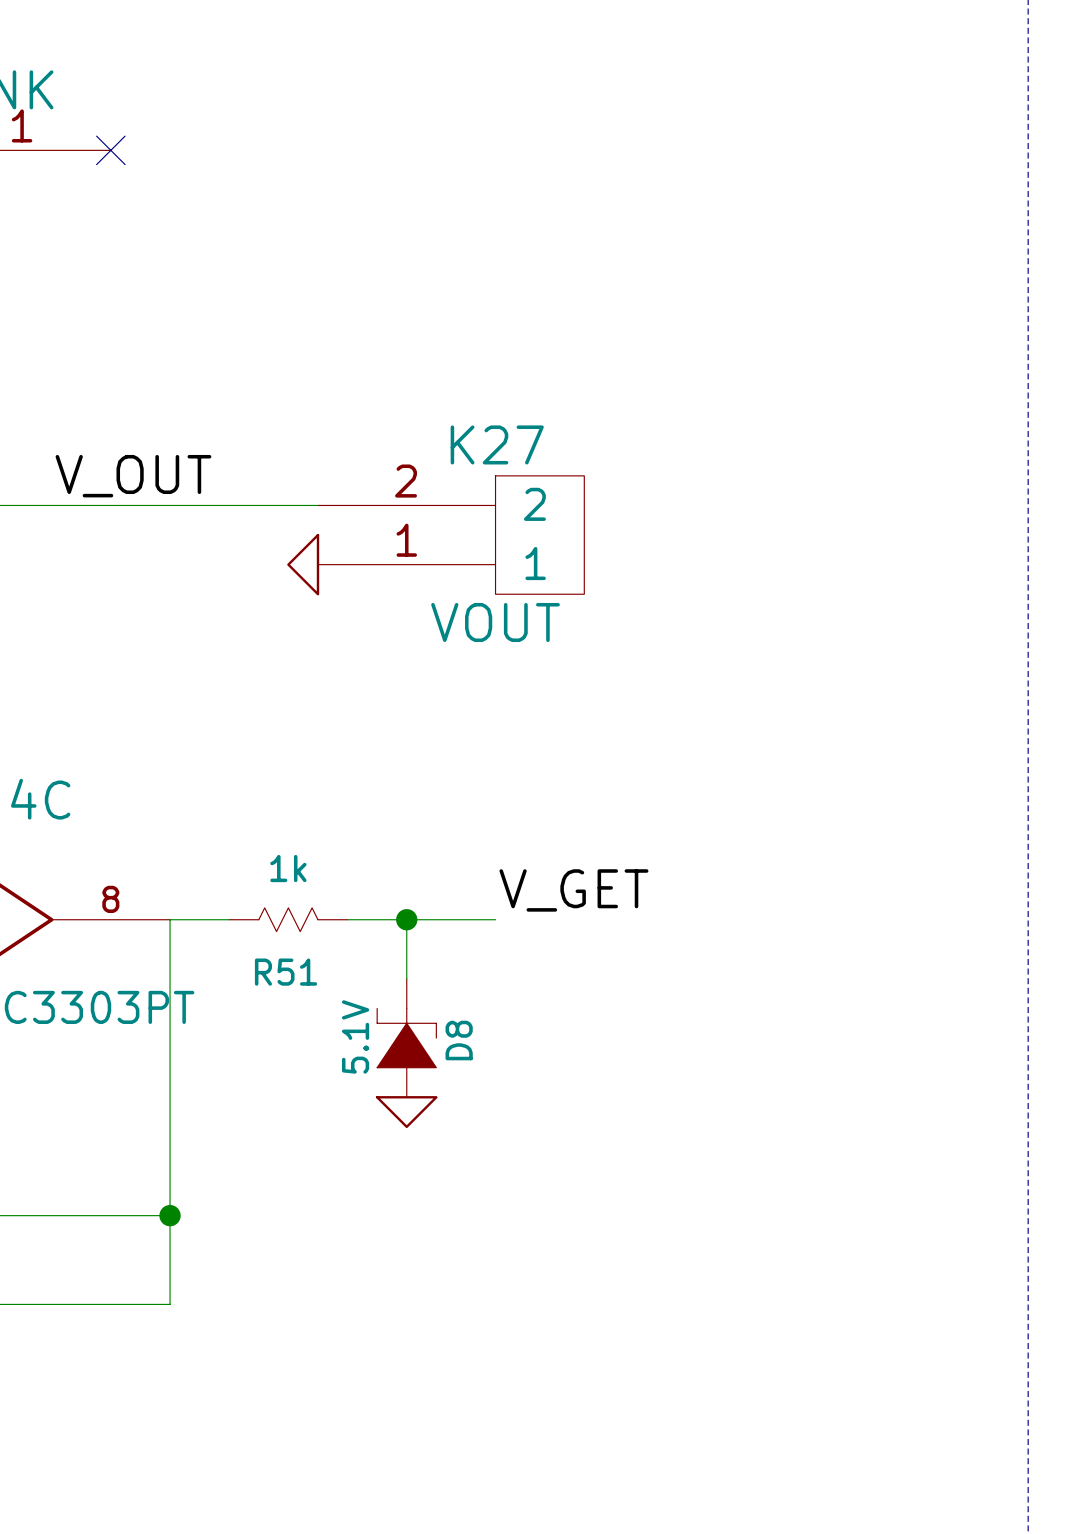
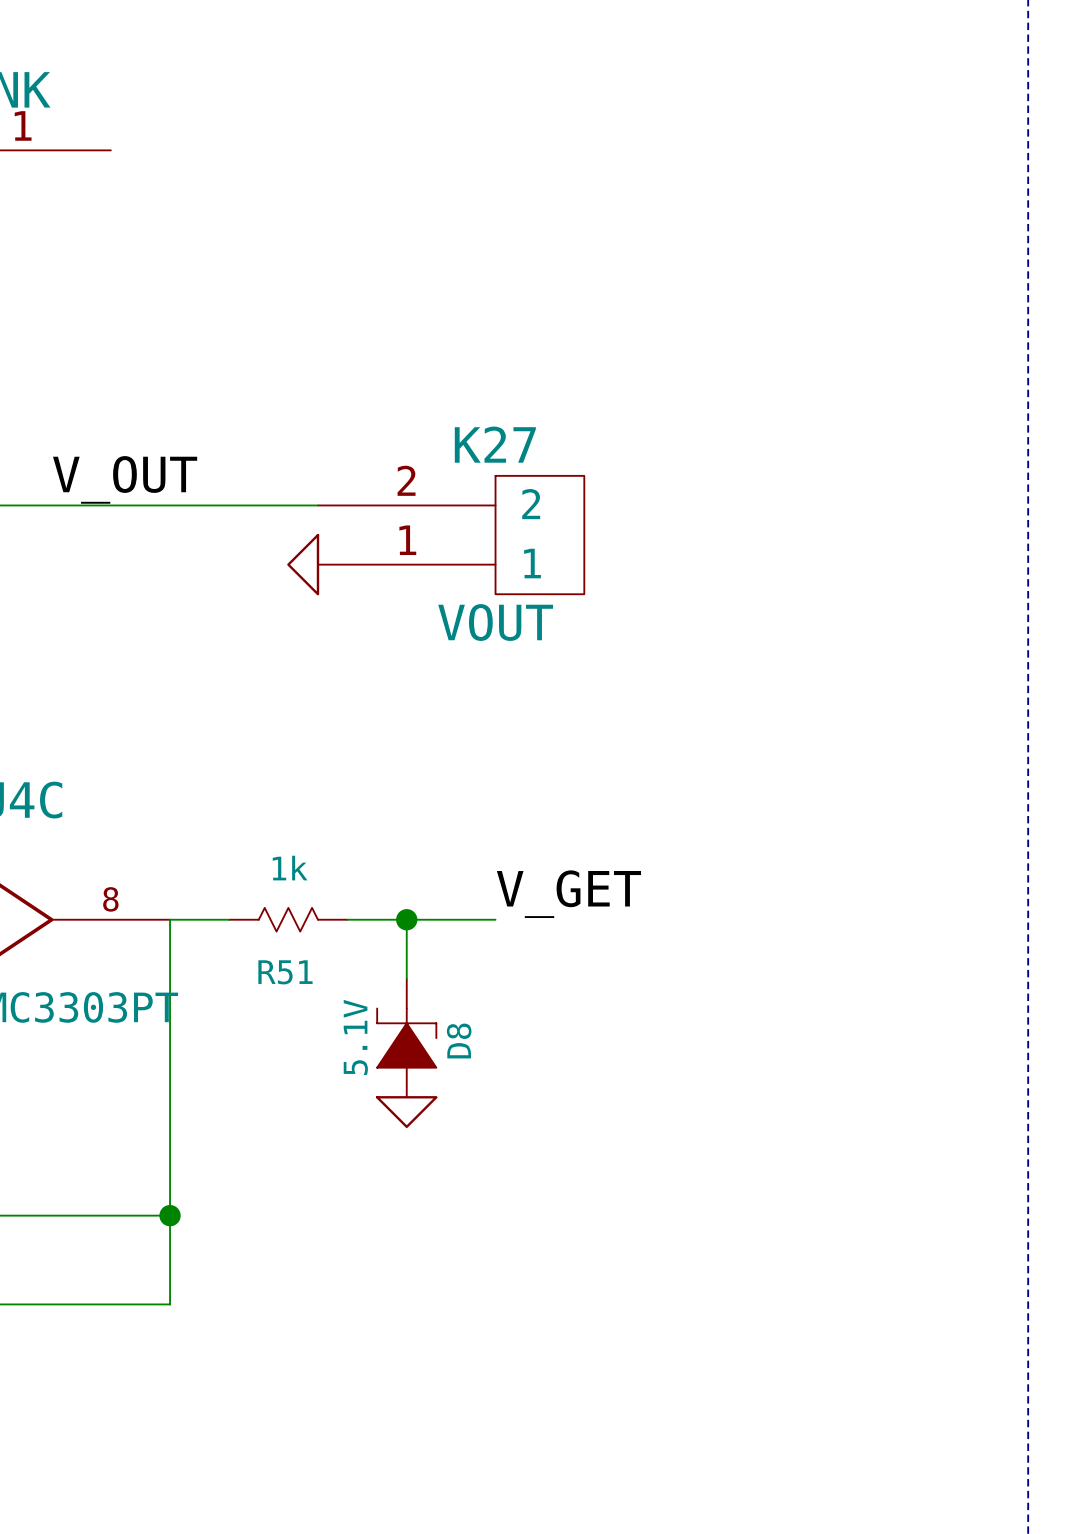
no-connect mark: (110, 150) -> none

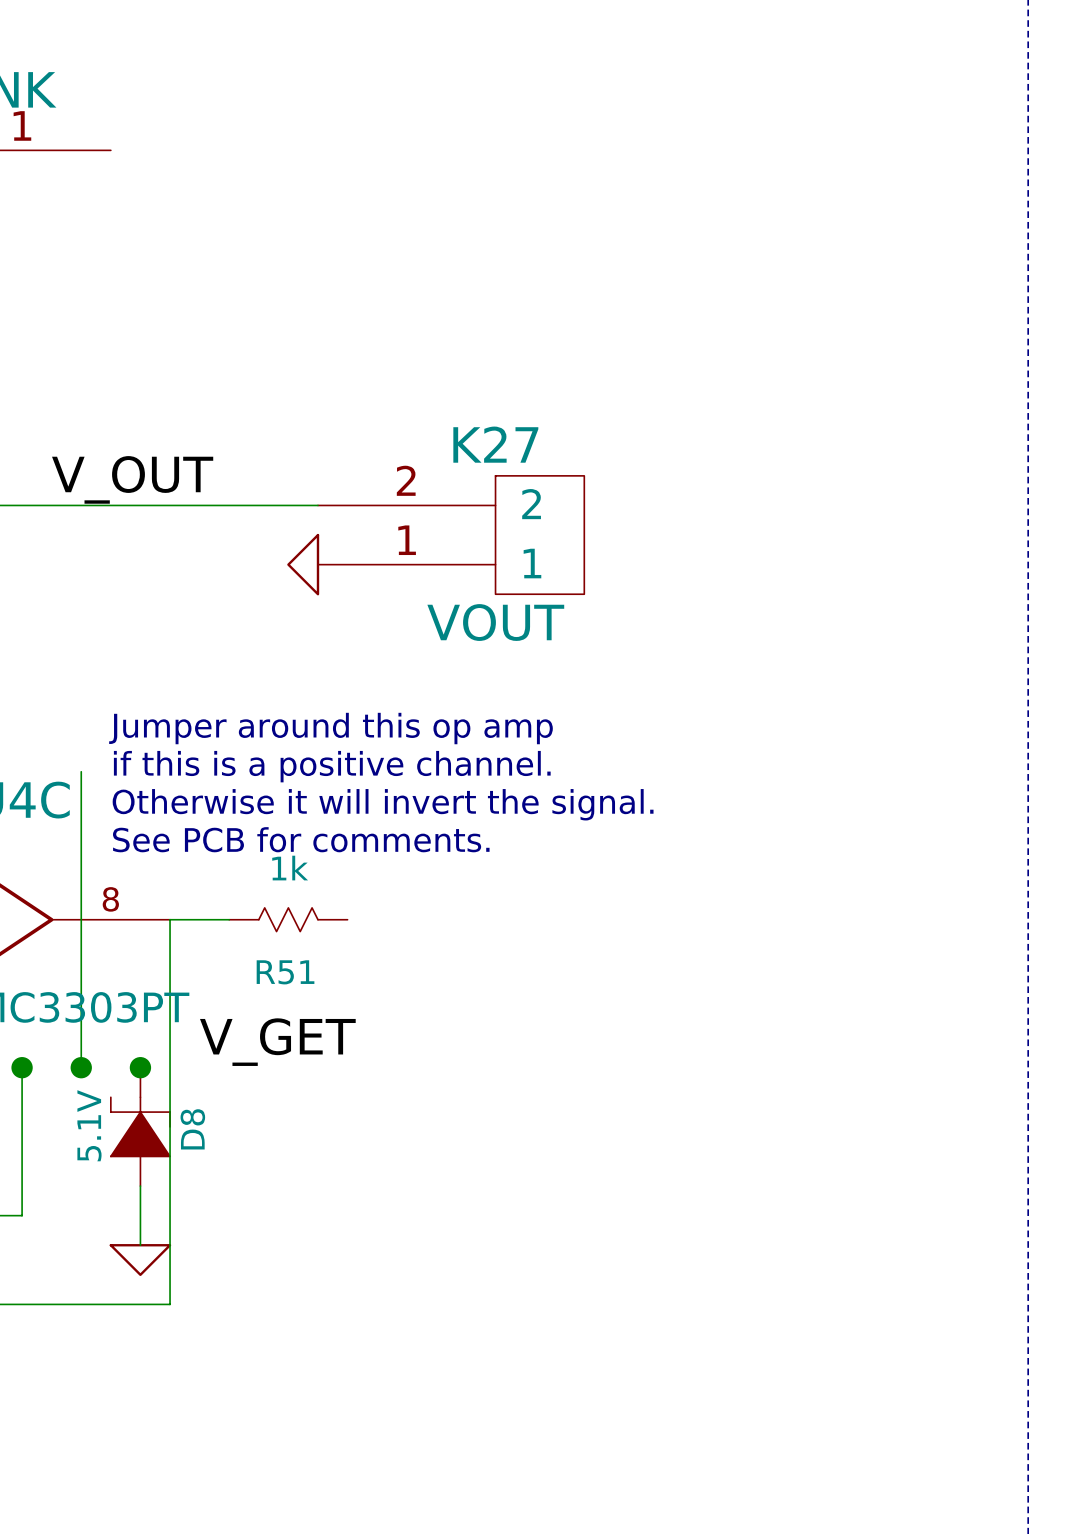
text: none -> Jumper around this op amp (331, 728)
text: none -> if this is a positive channel. (332, 766)
wire: none -> (81, 771) (81, 1067)
text: none -> Otherwise it will invert the signal. (383, 804)
text: none -> See PCB for comments. (301, 839)
label position: V_GET (568, 894) -> V_GET (277, 1042)
wire: (347, 919) (495, 919) -> none
wire: (406, 919) (406, 978) -> (140, 1186) (140, 1245)
junction: (406, 919) -> none
D8 position: (406, 1038) -> (140, 1126)
junction: none -> (22, 1067)
junction: none -> (81, 1067)
junction: none -> (140, 1067)
power symbol position: (406, 1112) -> (140, 1260)
wire: (22, 1215) (170, 1215) -> (22, 1215) (22, 1067)
junction: (170, 1215) -> none

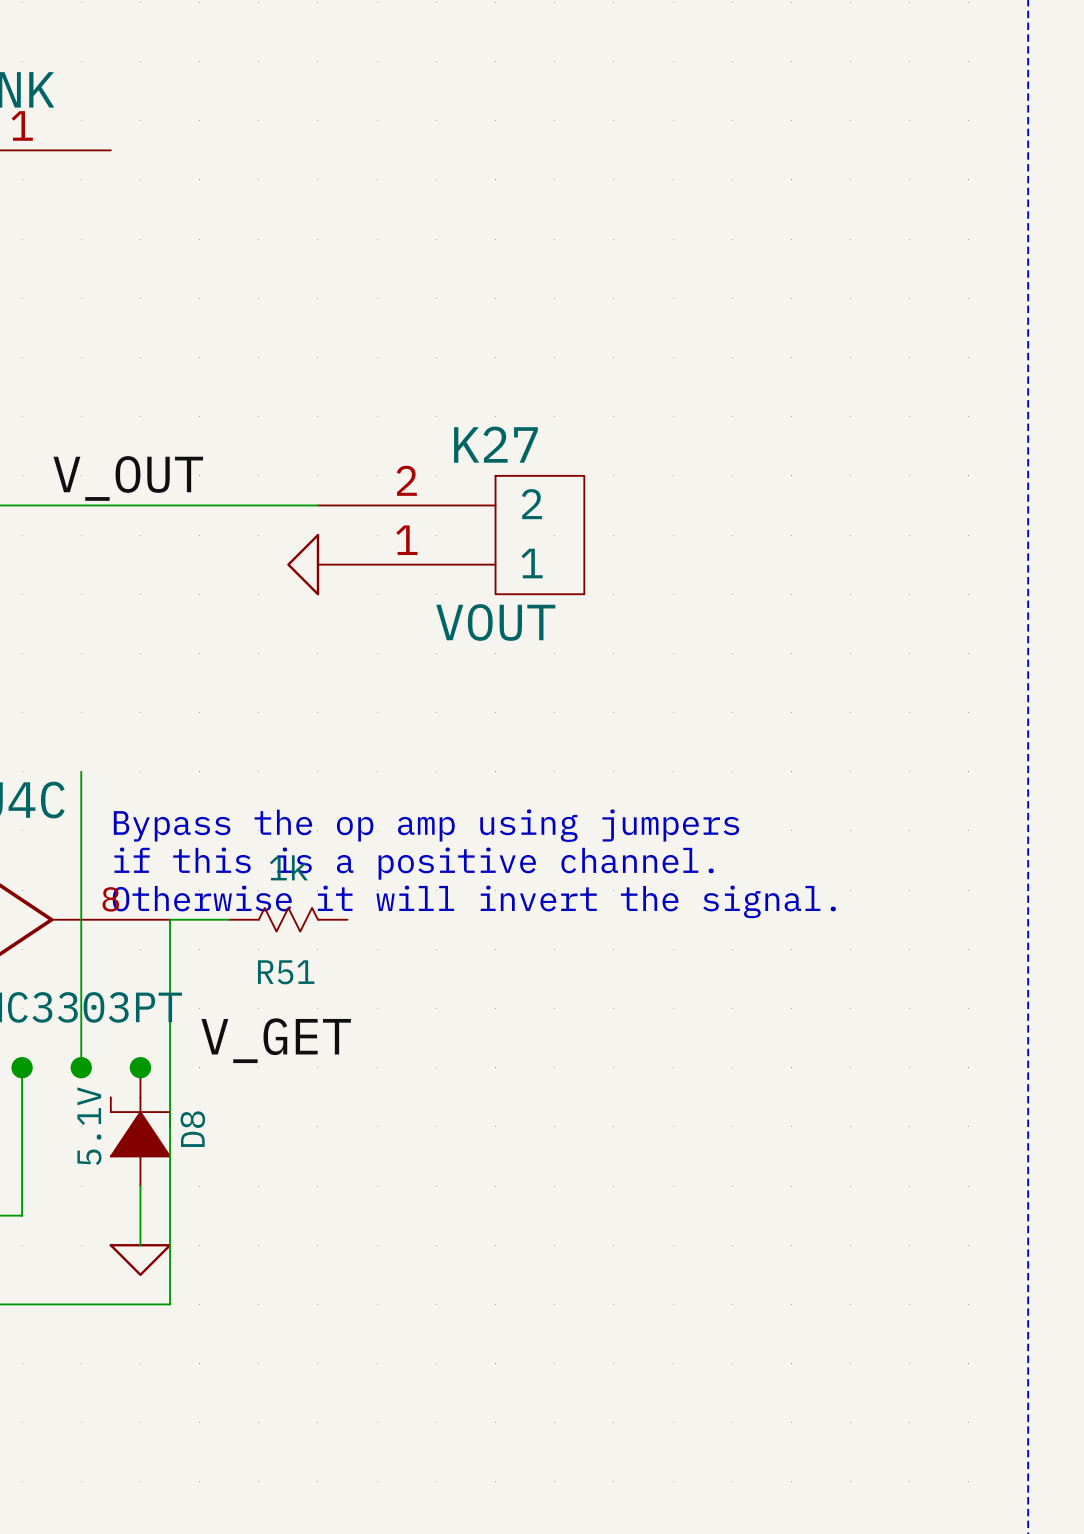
text: Jumper around this op amp (331, 728) -> none
text position: if this is a positive channel. (332, 766) -> if this is a positive channel. (414, 863)
text position: Otherwise it will invert the signal. (383, 804) -> Otherwise it will invert the signal. (474, 901)
text: See PCB for comments. (301, 839) -> Bypass the op amp using jumpers (426, 825)

